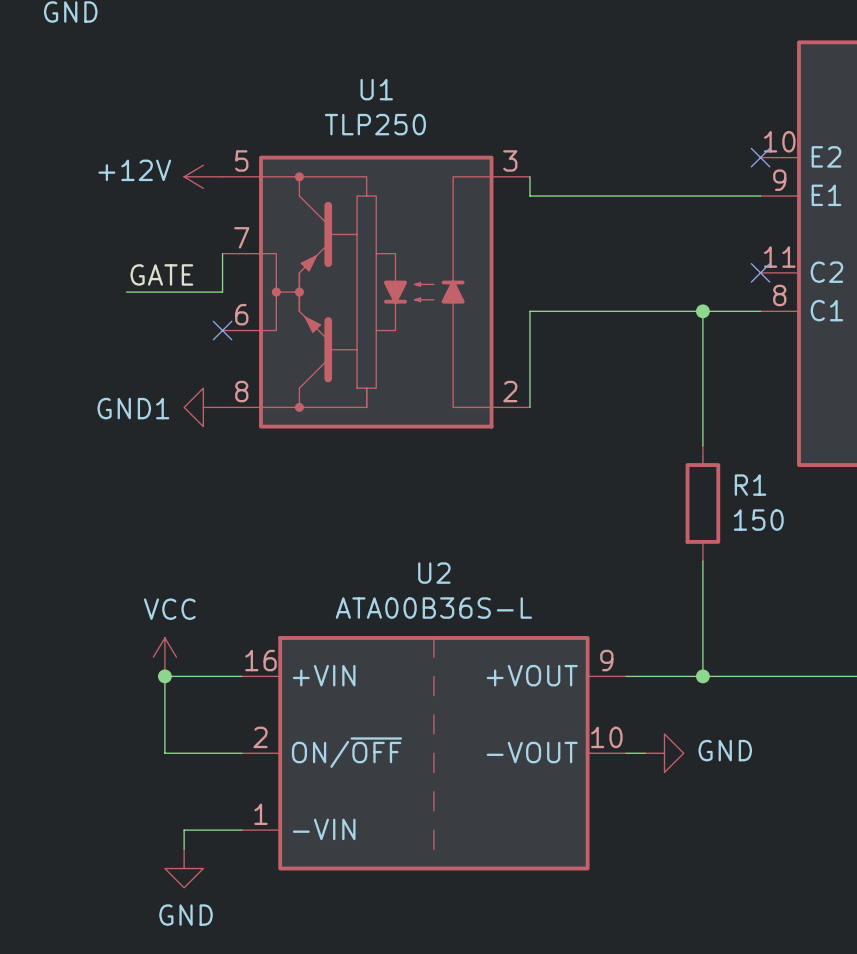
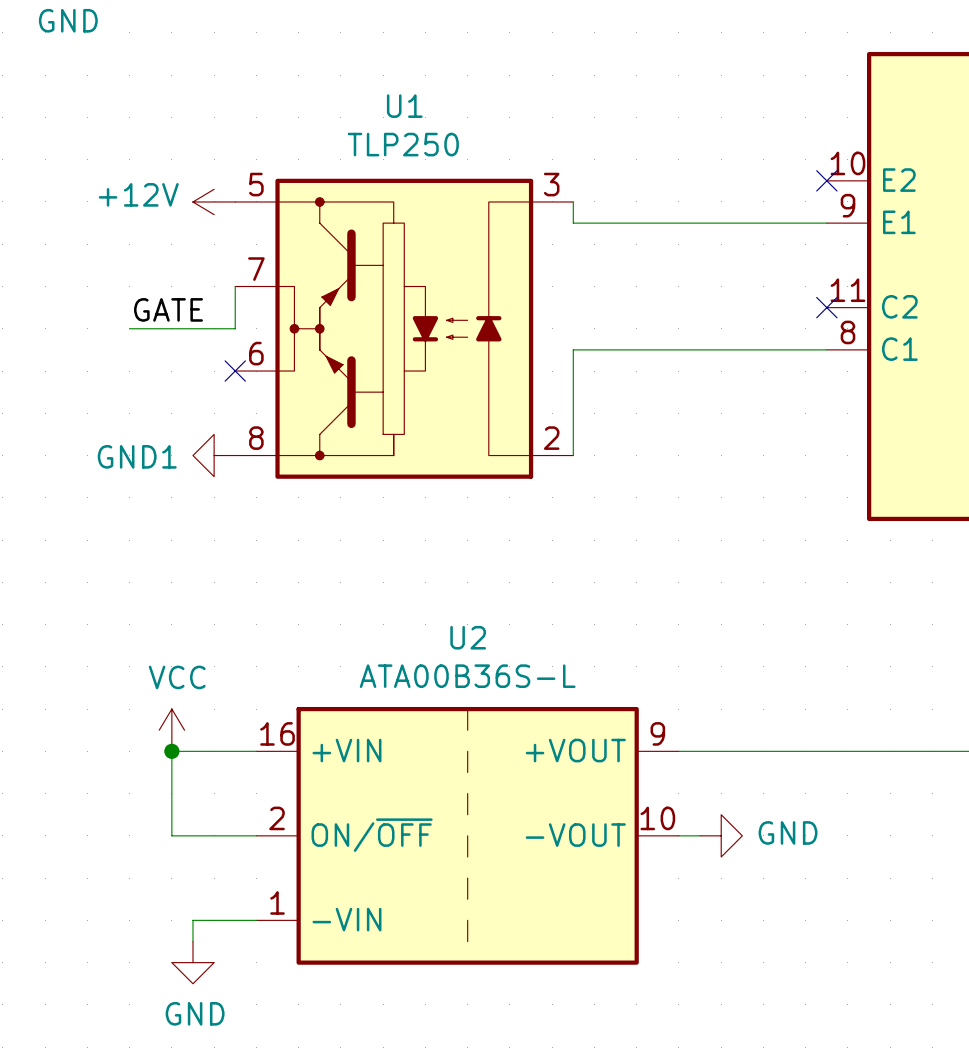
wire: (702, 311) (702, 445) -> none
junction: (702, 311) -> none
R1: 150 (702, 503) -> none
wire: (702, 561) (702, 676) -> none
junction: (702, 676) -> none

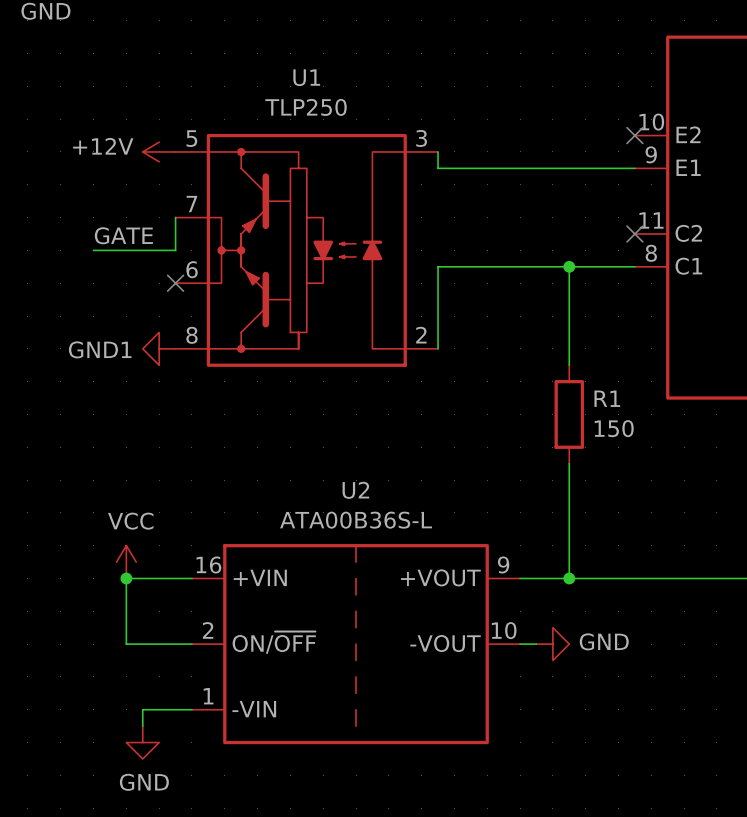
wire: none -> (569, 266) (569, 365)
junction: none -> (569, 266)
R1: none -> 150 (569, 414)
wire: none -> (569, 463) (569, 578)
junction: none -> (569, 578)

